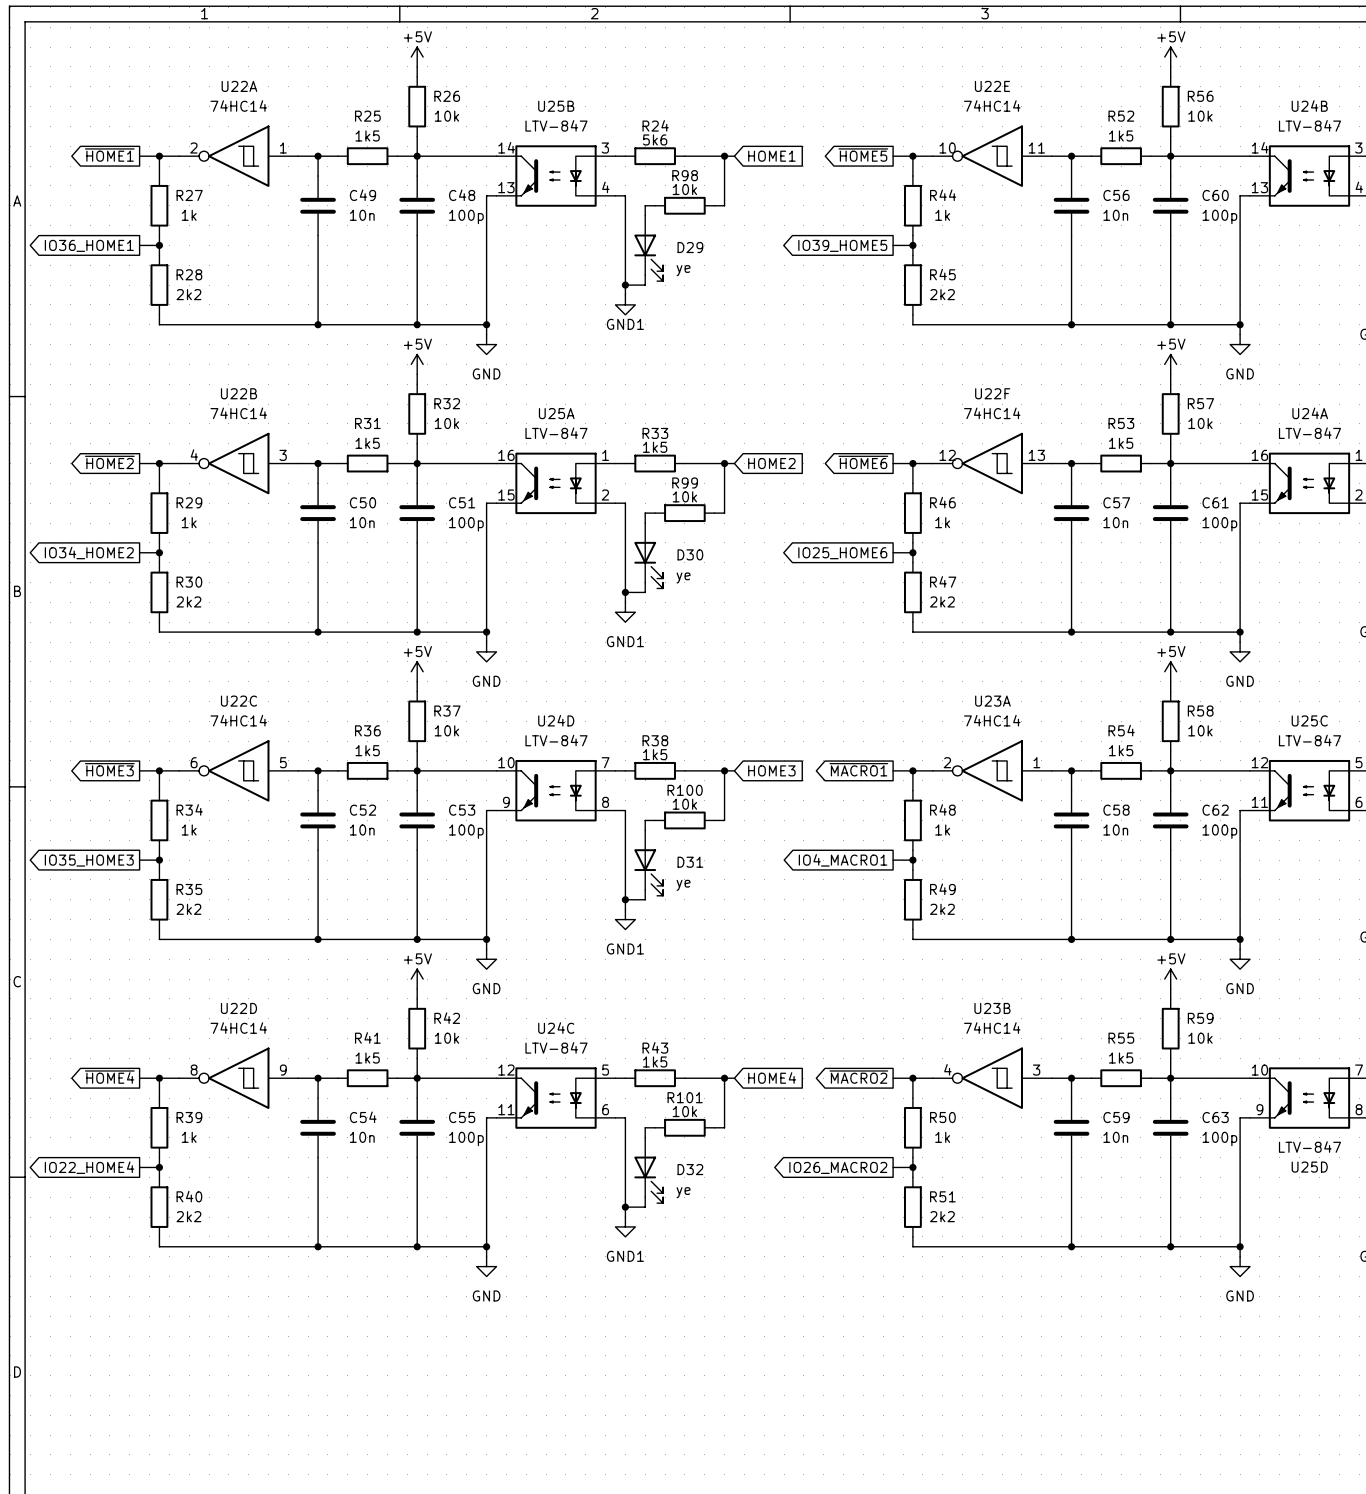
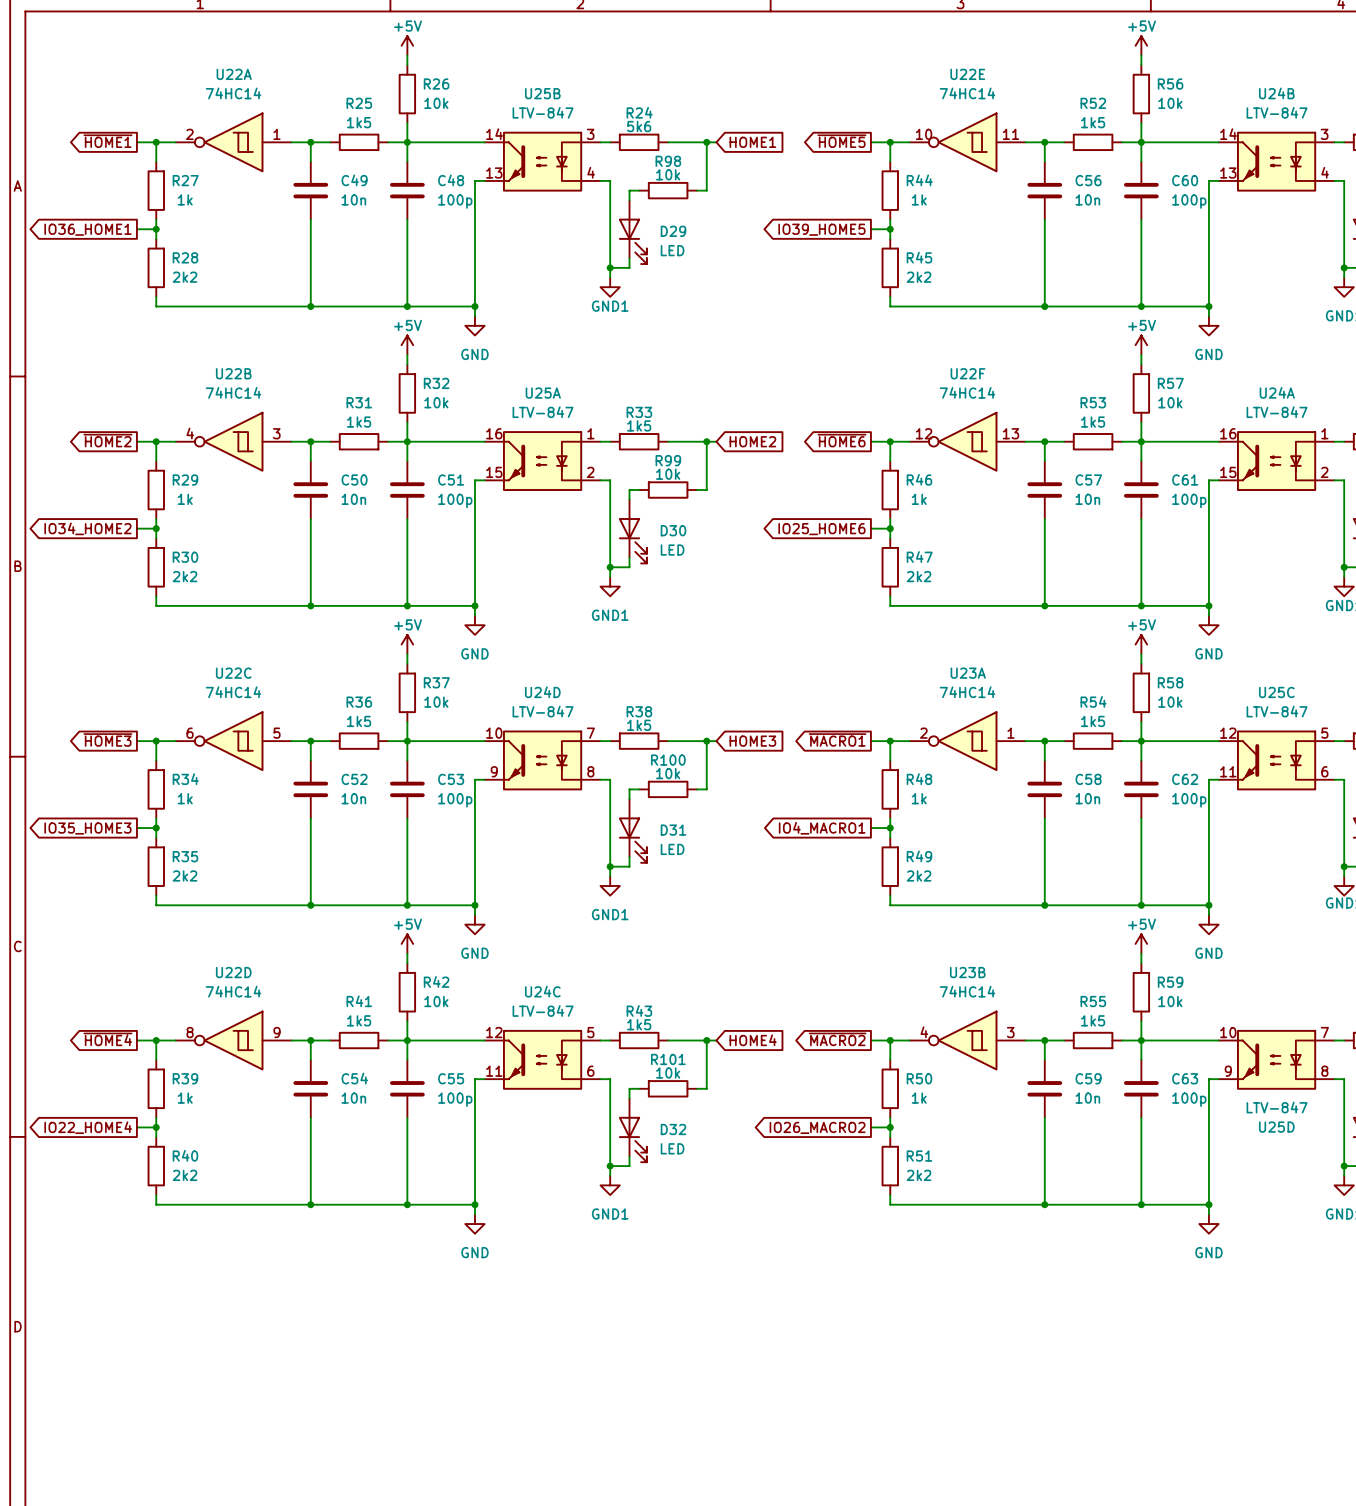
D29 value: ye (683, 270) -> LED (672, 250)
D30 value: ye (683, 578) -> LED (672, 550)
D31 value: ye (683, 885) -> LED (672, 849)
D32 value: ye (683, 1192) -> LED (672, 1148)

